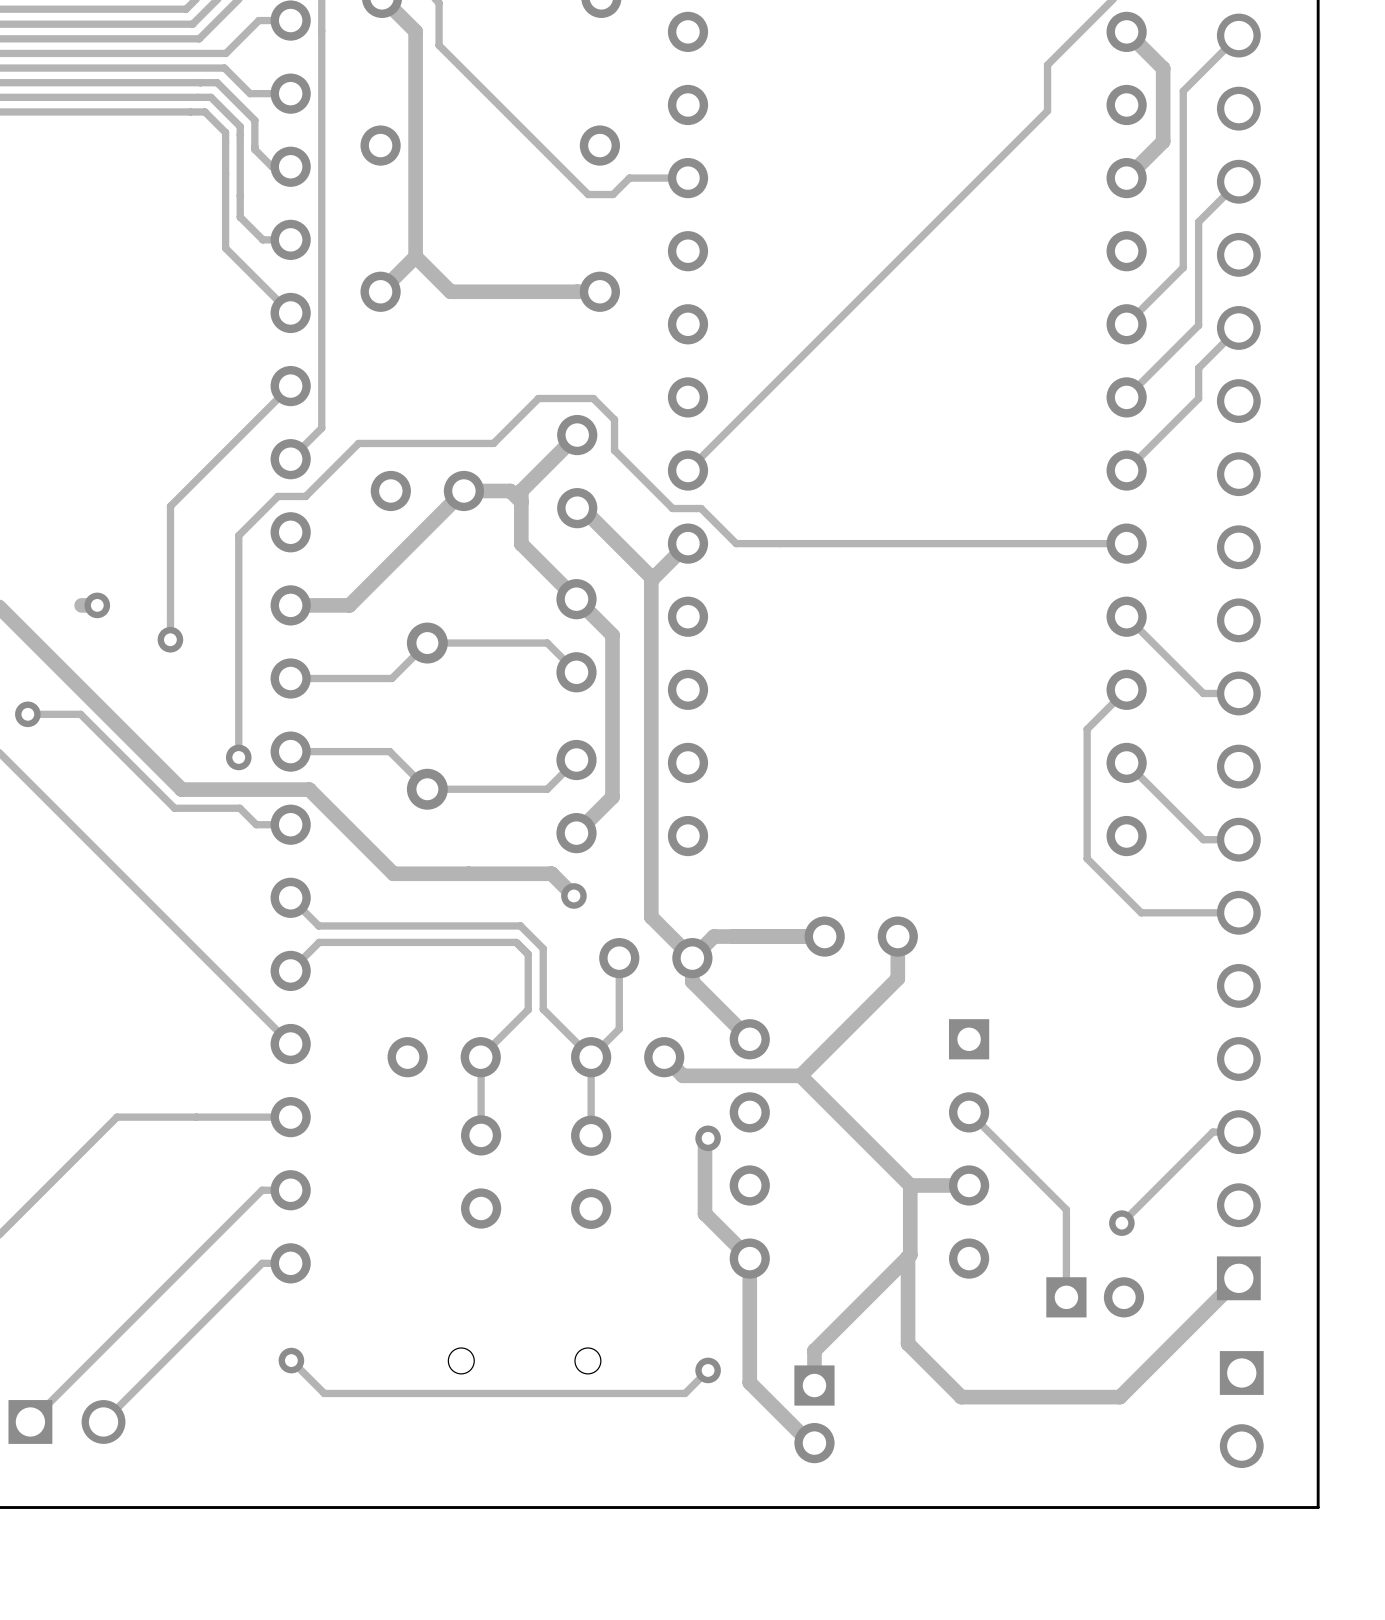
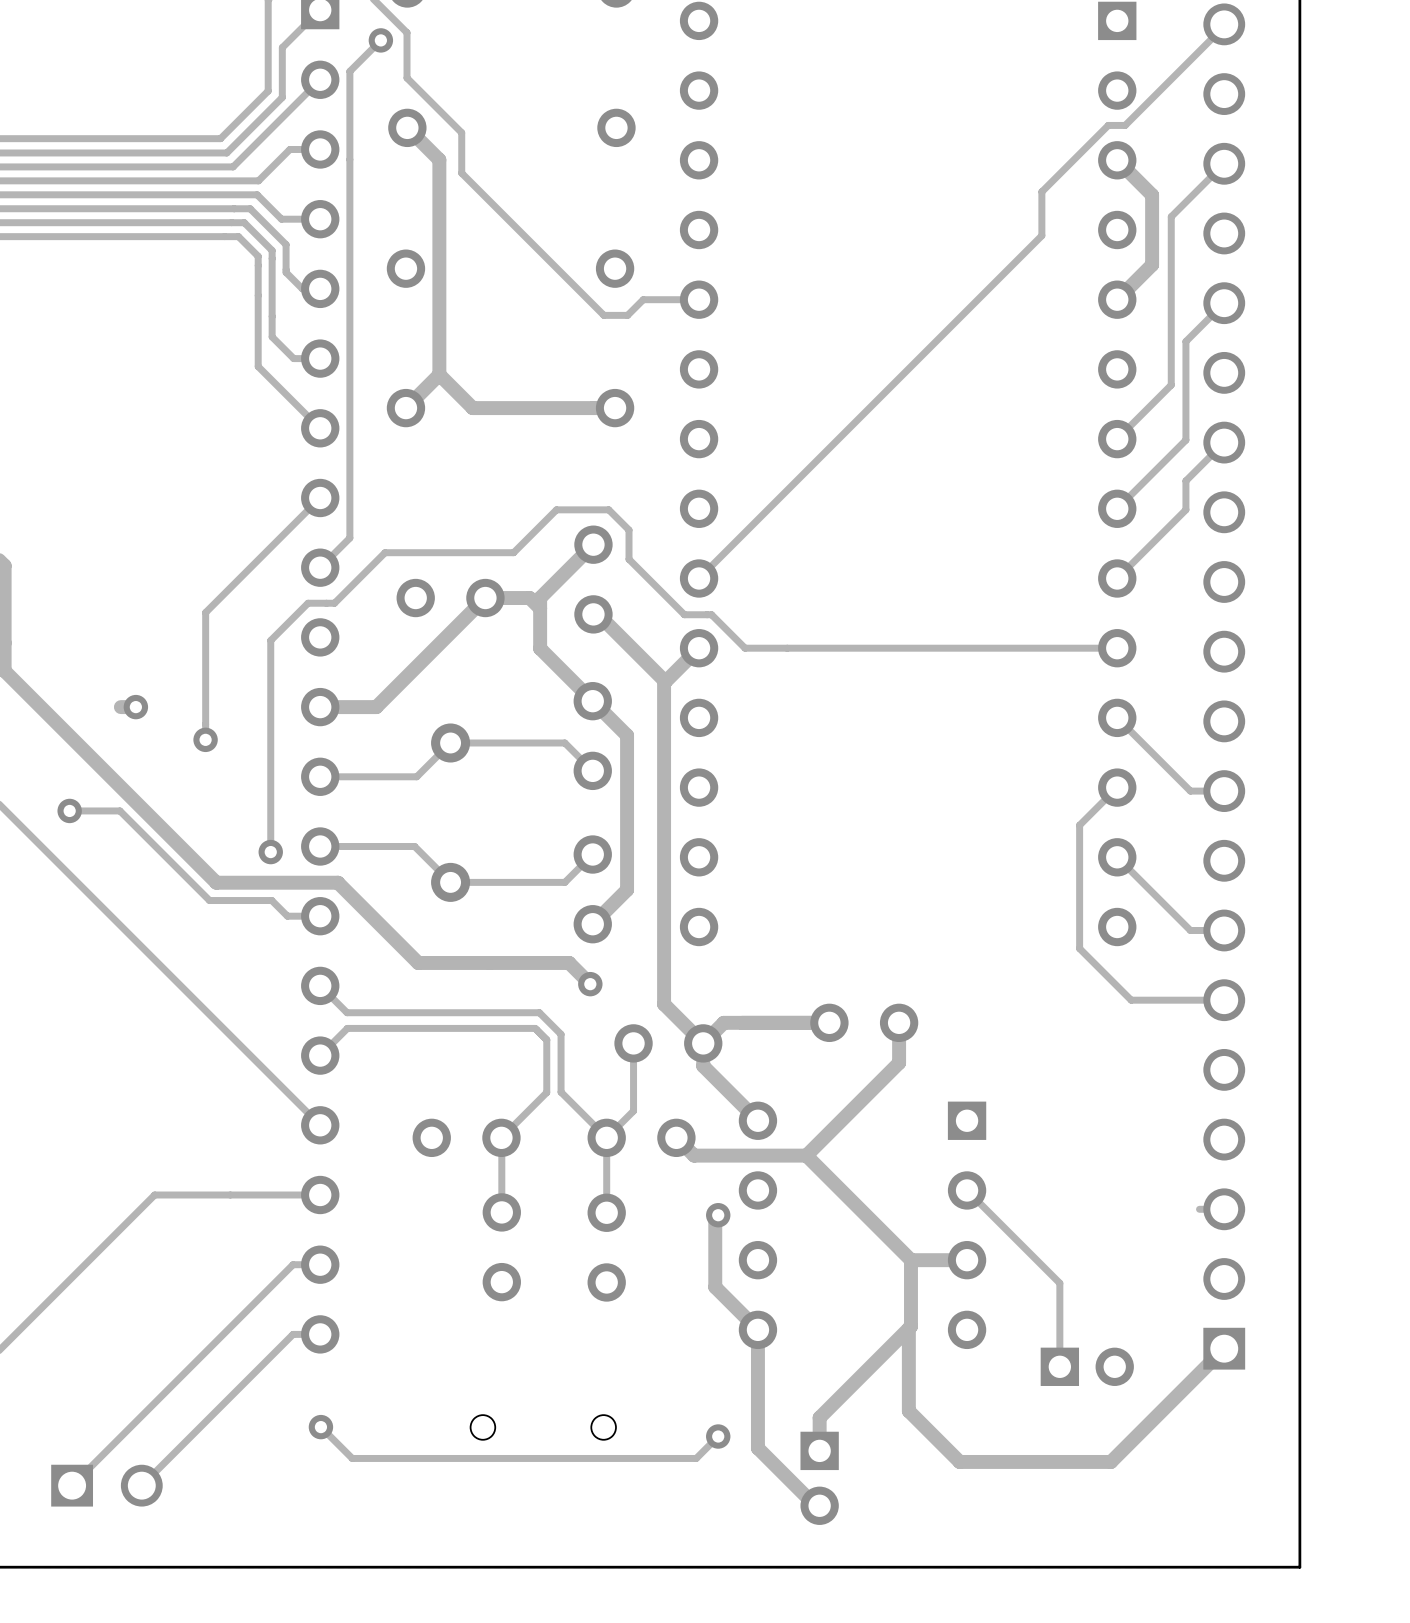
track: (1212, 1132) (1121, 1223) -> none
via: (1121, 1223) -> none
part: (1241, 1409) -> none

